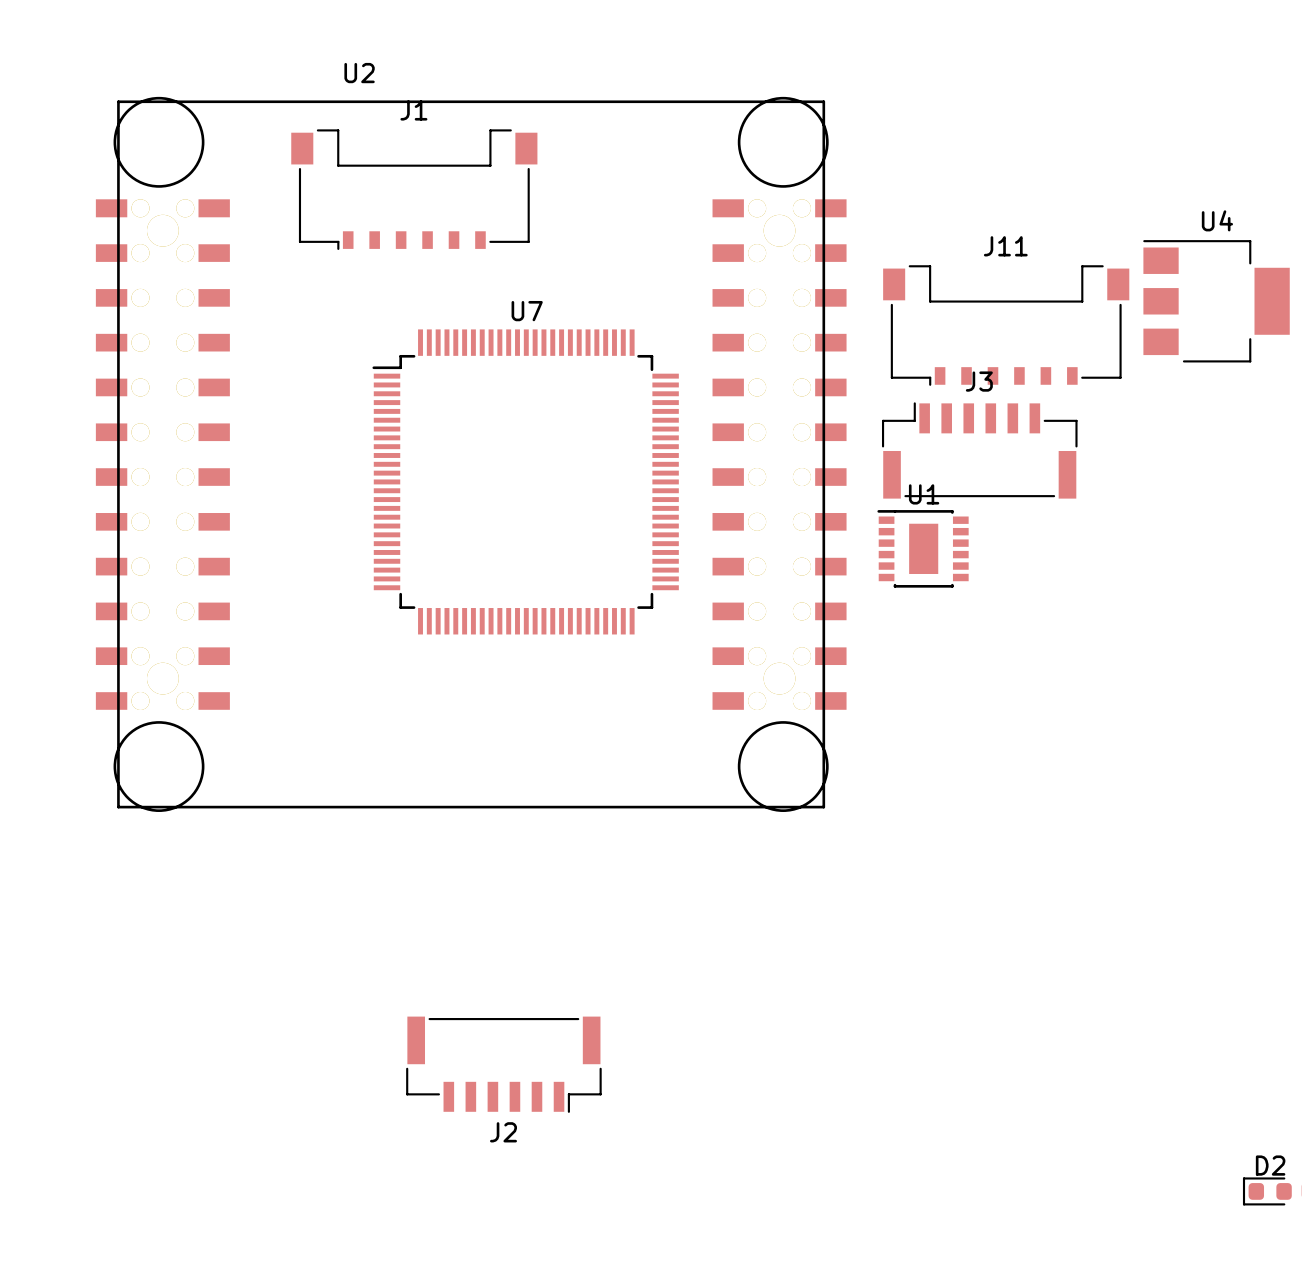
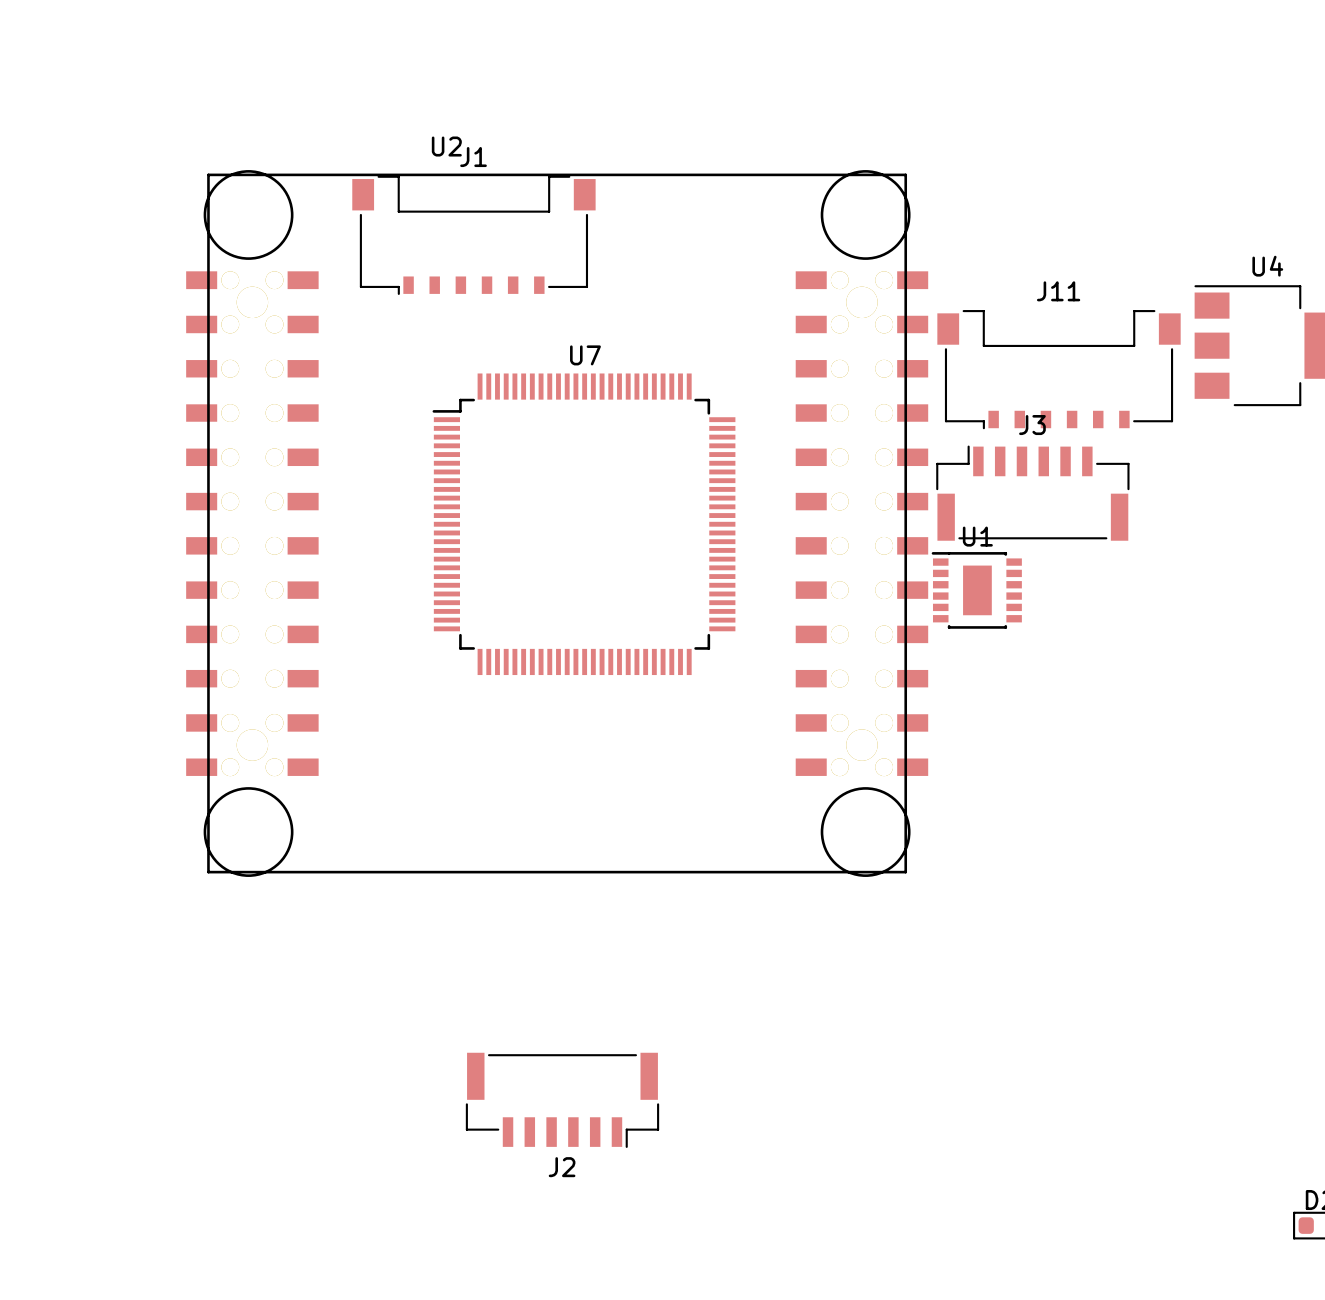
U2 position: (471, 454) -> (557, 523)

